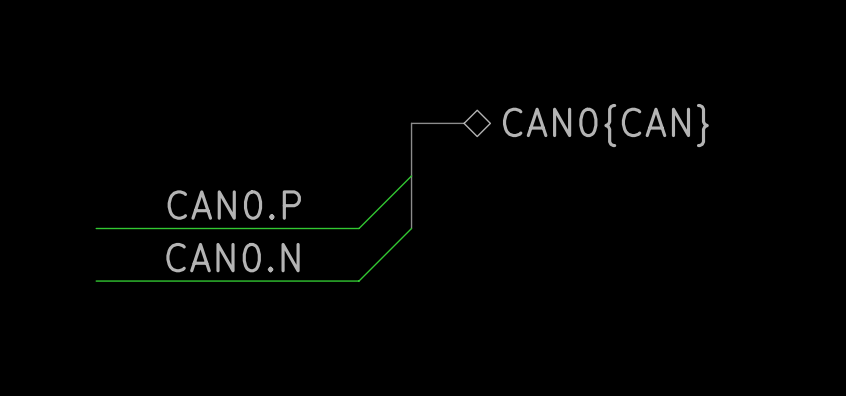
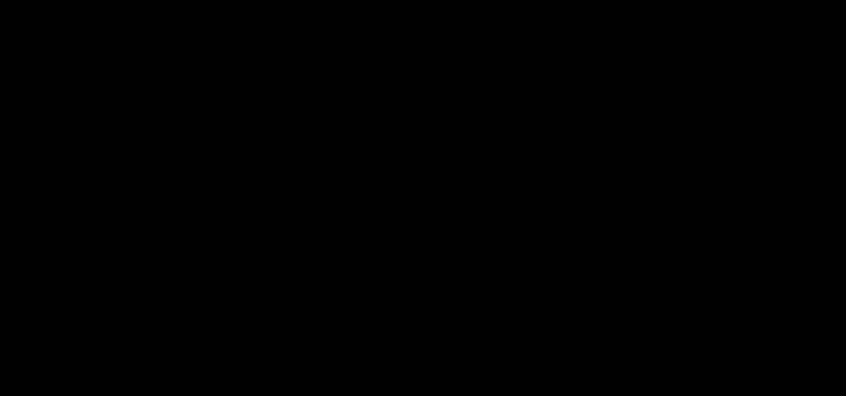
bus: (464, 123) (411, 123) (411, 228) -> none
hierarchical label: CAN0{CAN} (605, 125) -> none
wire: (411, 175) (358, 228) (96, 228) -> none
label: CAN0.P (234, 205) -> none
wire: (411, 228) (358, 281) (96, 281) -> none
label: CAN0.N (233, 257) -> none

